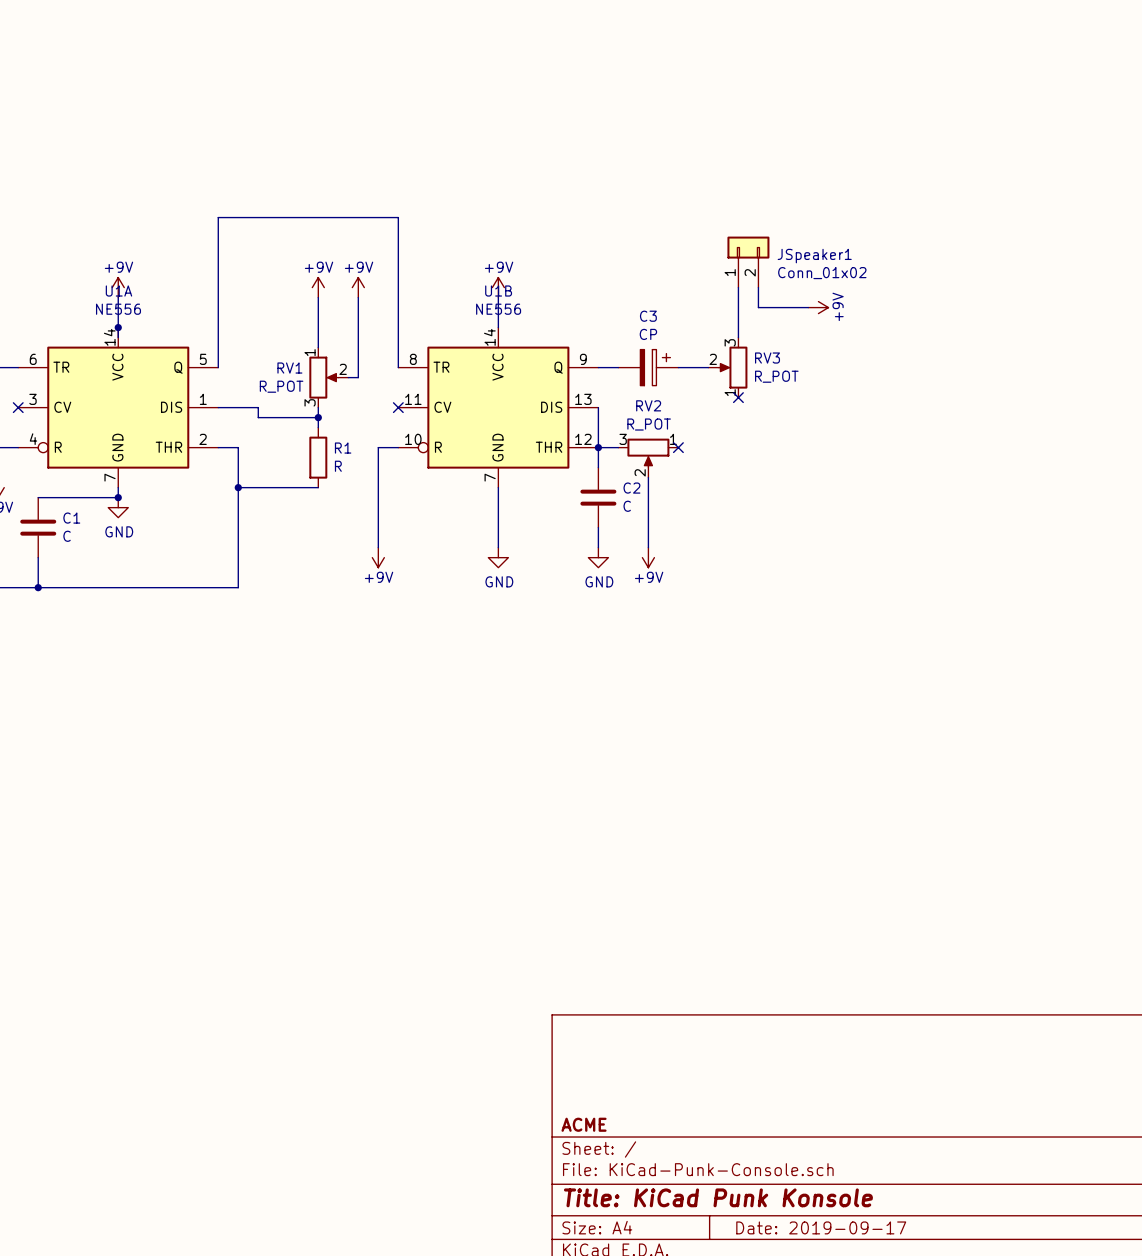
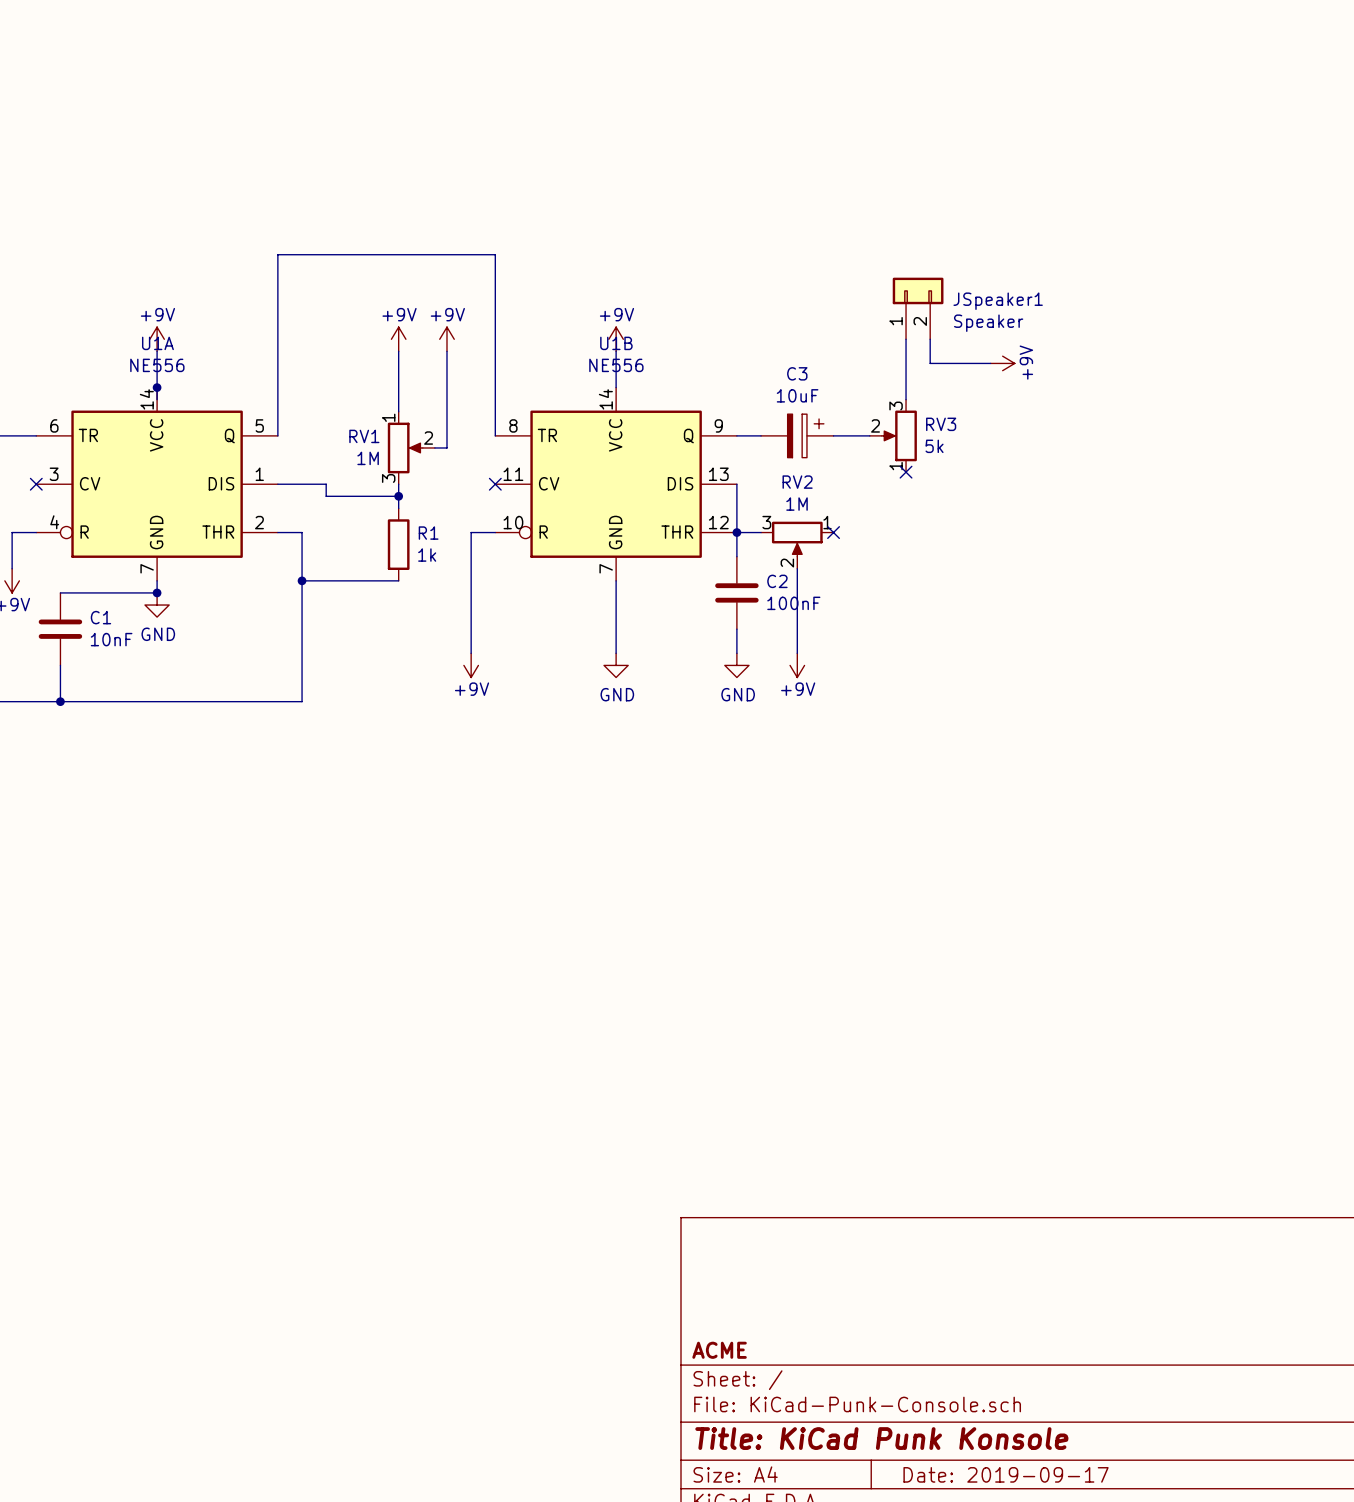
JSpeaker1 value: Conn_01x02 (822, 273) -> Speaker (988, 323)
C3 value: CP (648, 334) -> 10uF (797, 395)
RV3 value: R_POT (776, 376) -> 5k (934, 446)
RV1 value: R_POT (281, 386) -> 1M (368, 458)
RV2 value: R_POT (649, 424) -> 1M (797, 504)
R1 value: R (338, 466) -> 1k (427, 555)
C2 value: C (627, 506) -> 100nF (793, 603)
C1 value: C (67, 536) -> 10nF (111, 639)

